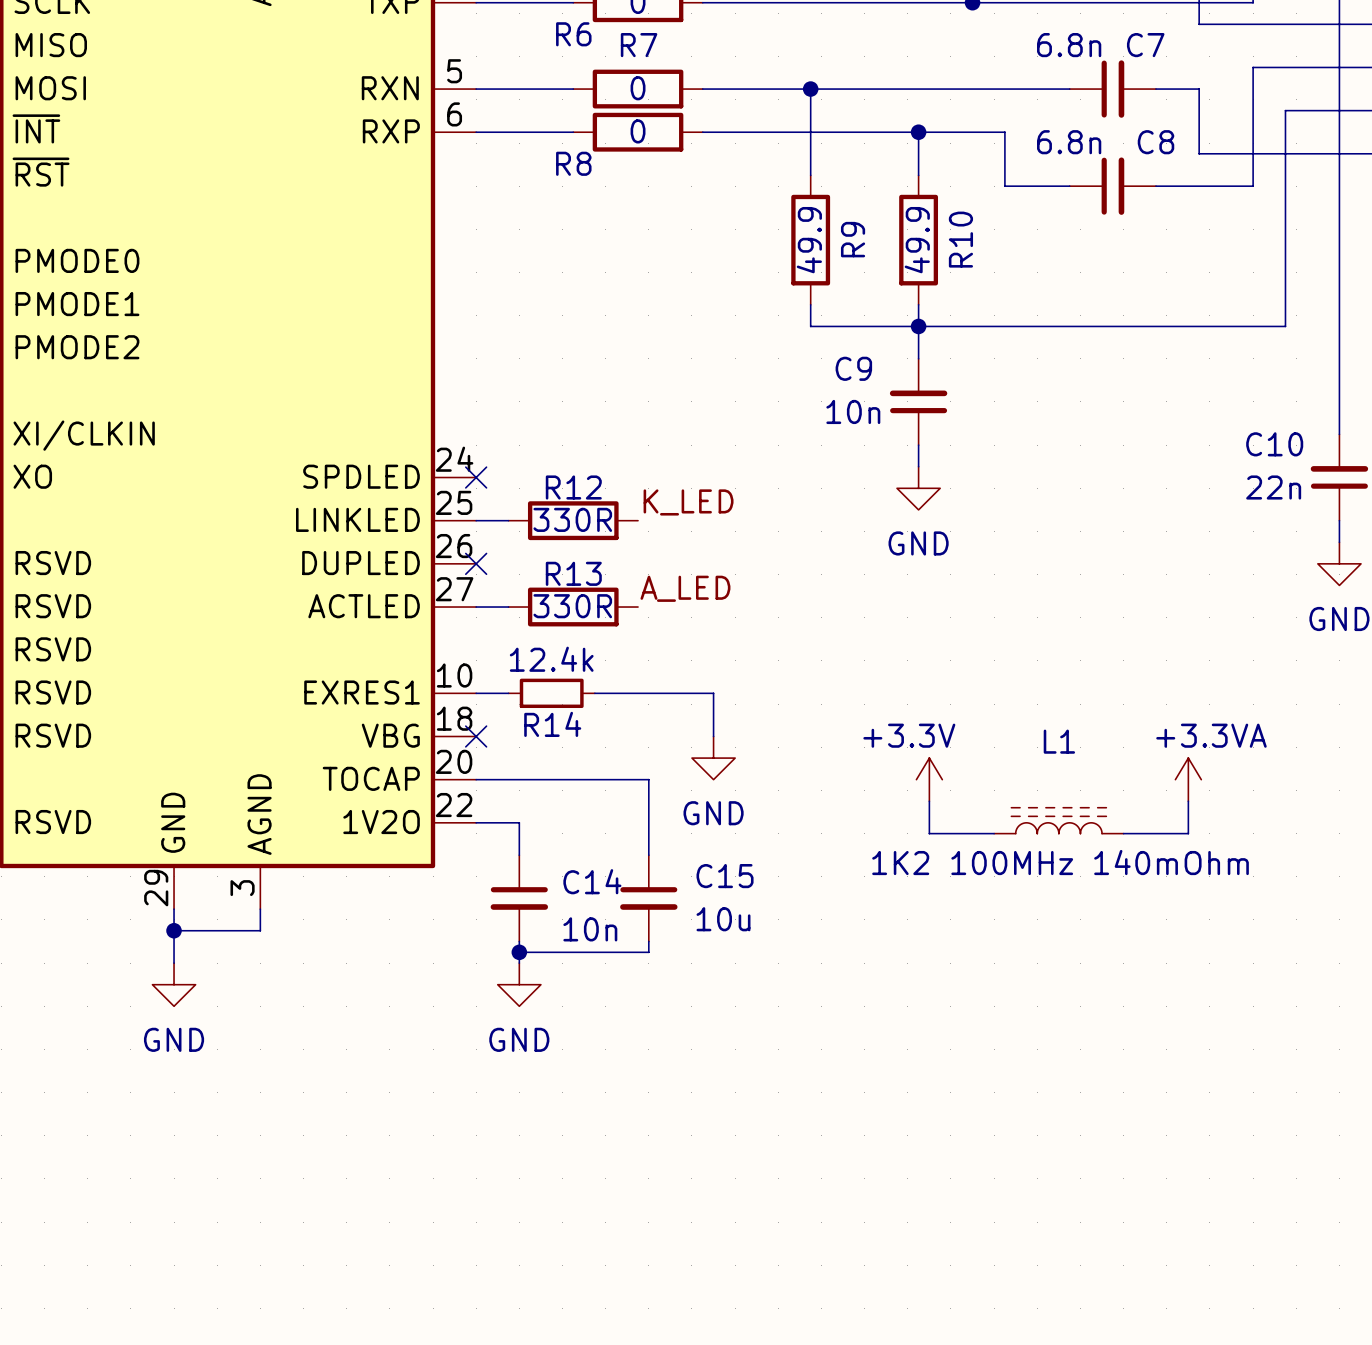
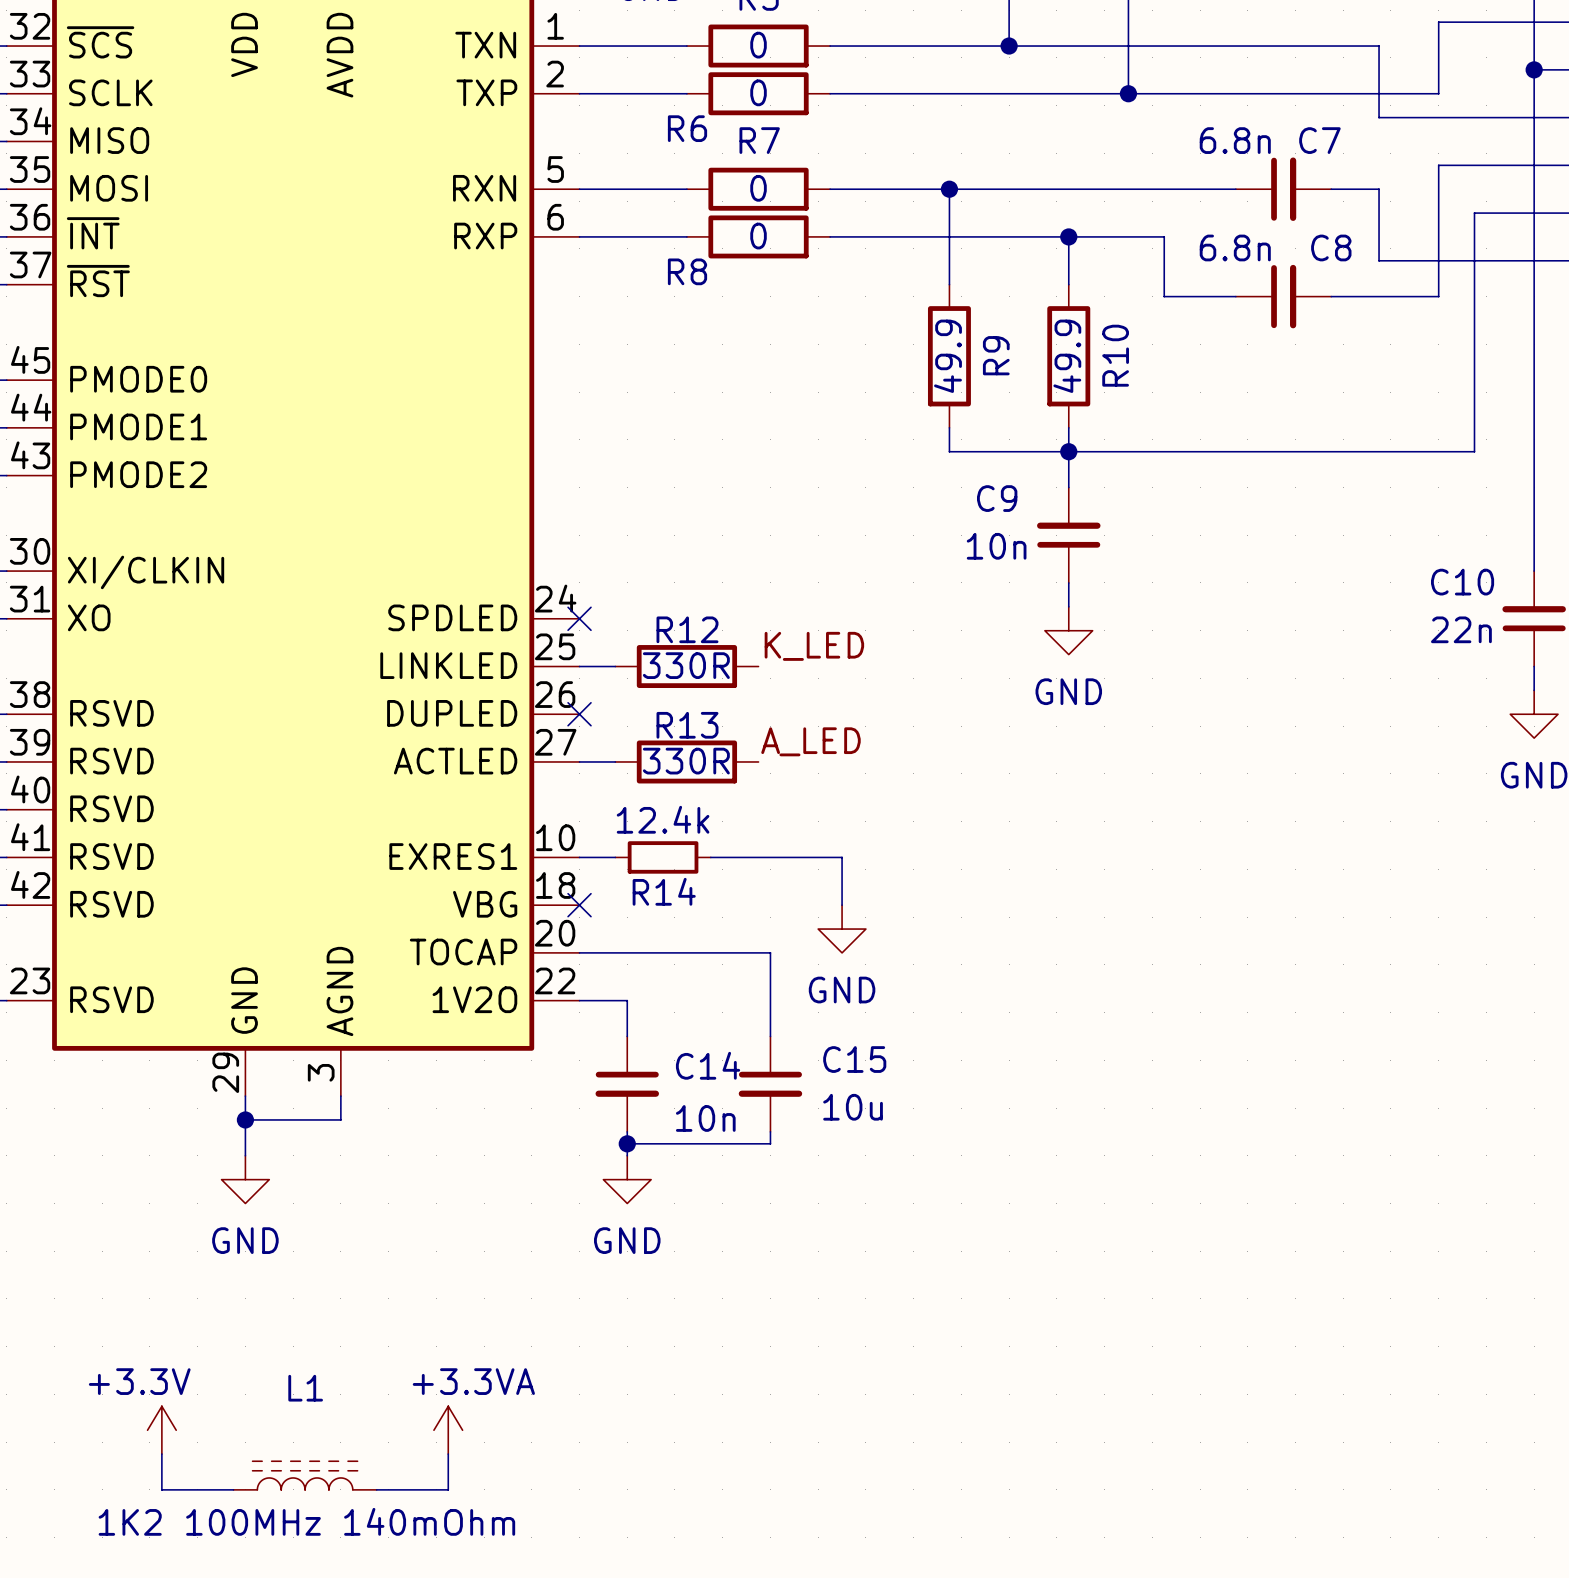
power symbol: +3.3V (929, 779) -> none
power symbol: +3.3VA (1188, 779) -> none
wire: (929, 801) (929, 833) (994, 833) -> none
wire: (1188, 801) (1188, 833) (1123, 833) -> none
L1 position: (1058, 820) -> (305, 1475)
power symbol: none -> +3.3V (161, 1430)
power symbol: none -> +3.3VA (448, 1430)
wire: none -> (161, 1454) (161, 1489) (233, 1489)
wire: none -> (448, 1454) (448, 1489) (376, 1489)

